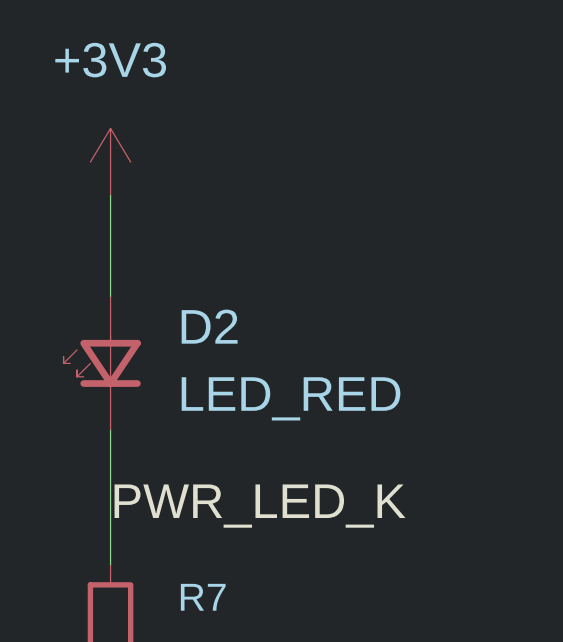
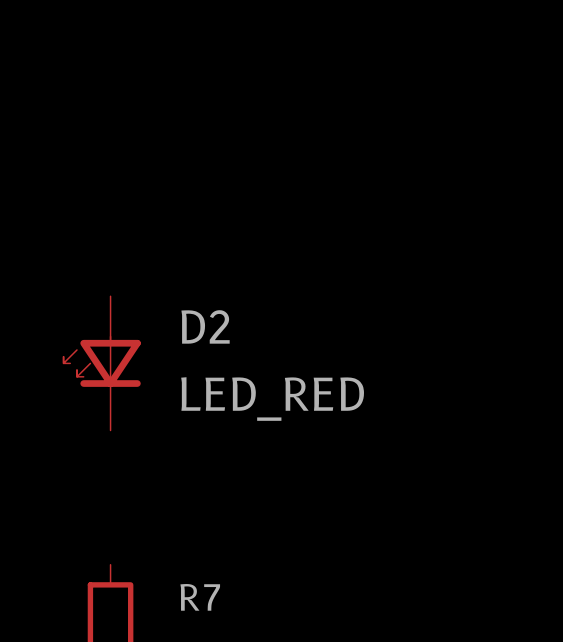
power symbol: +3V3 (110, 162) -> none
wire: (110, 195) (110, 296) -> none
wire: (110, 430) (110, 564) -> none
label: PWR_LED_K (260, 506) -> none

